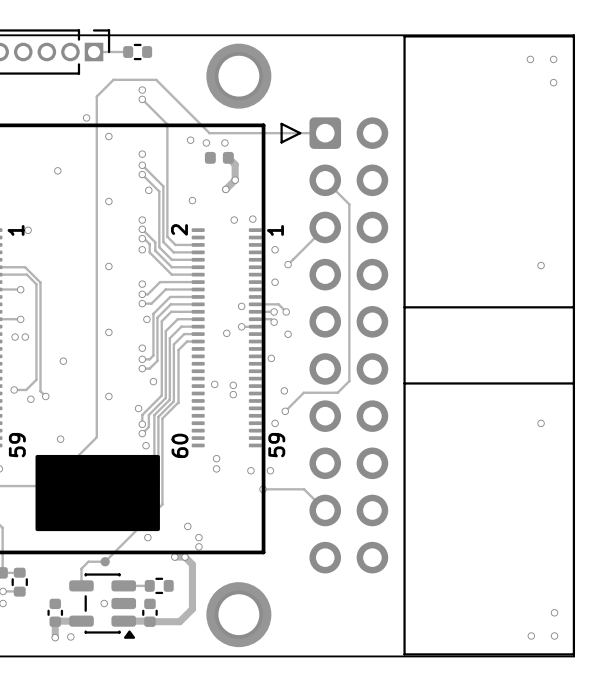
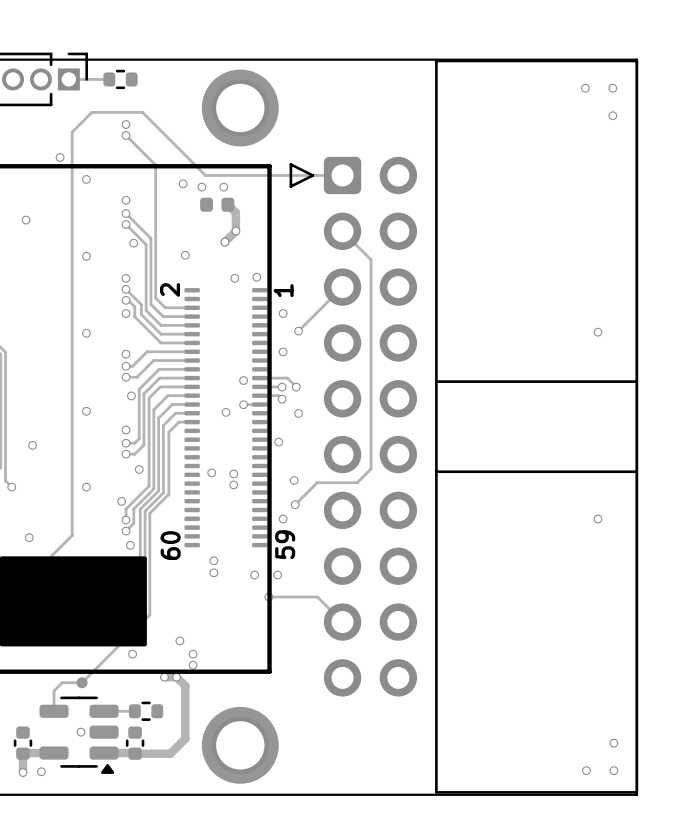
part footprint: [69, 573, 137, 639] -> [39, 696, 119, 774]

